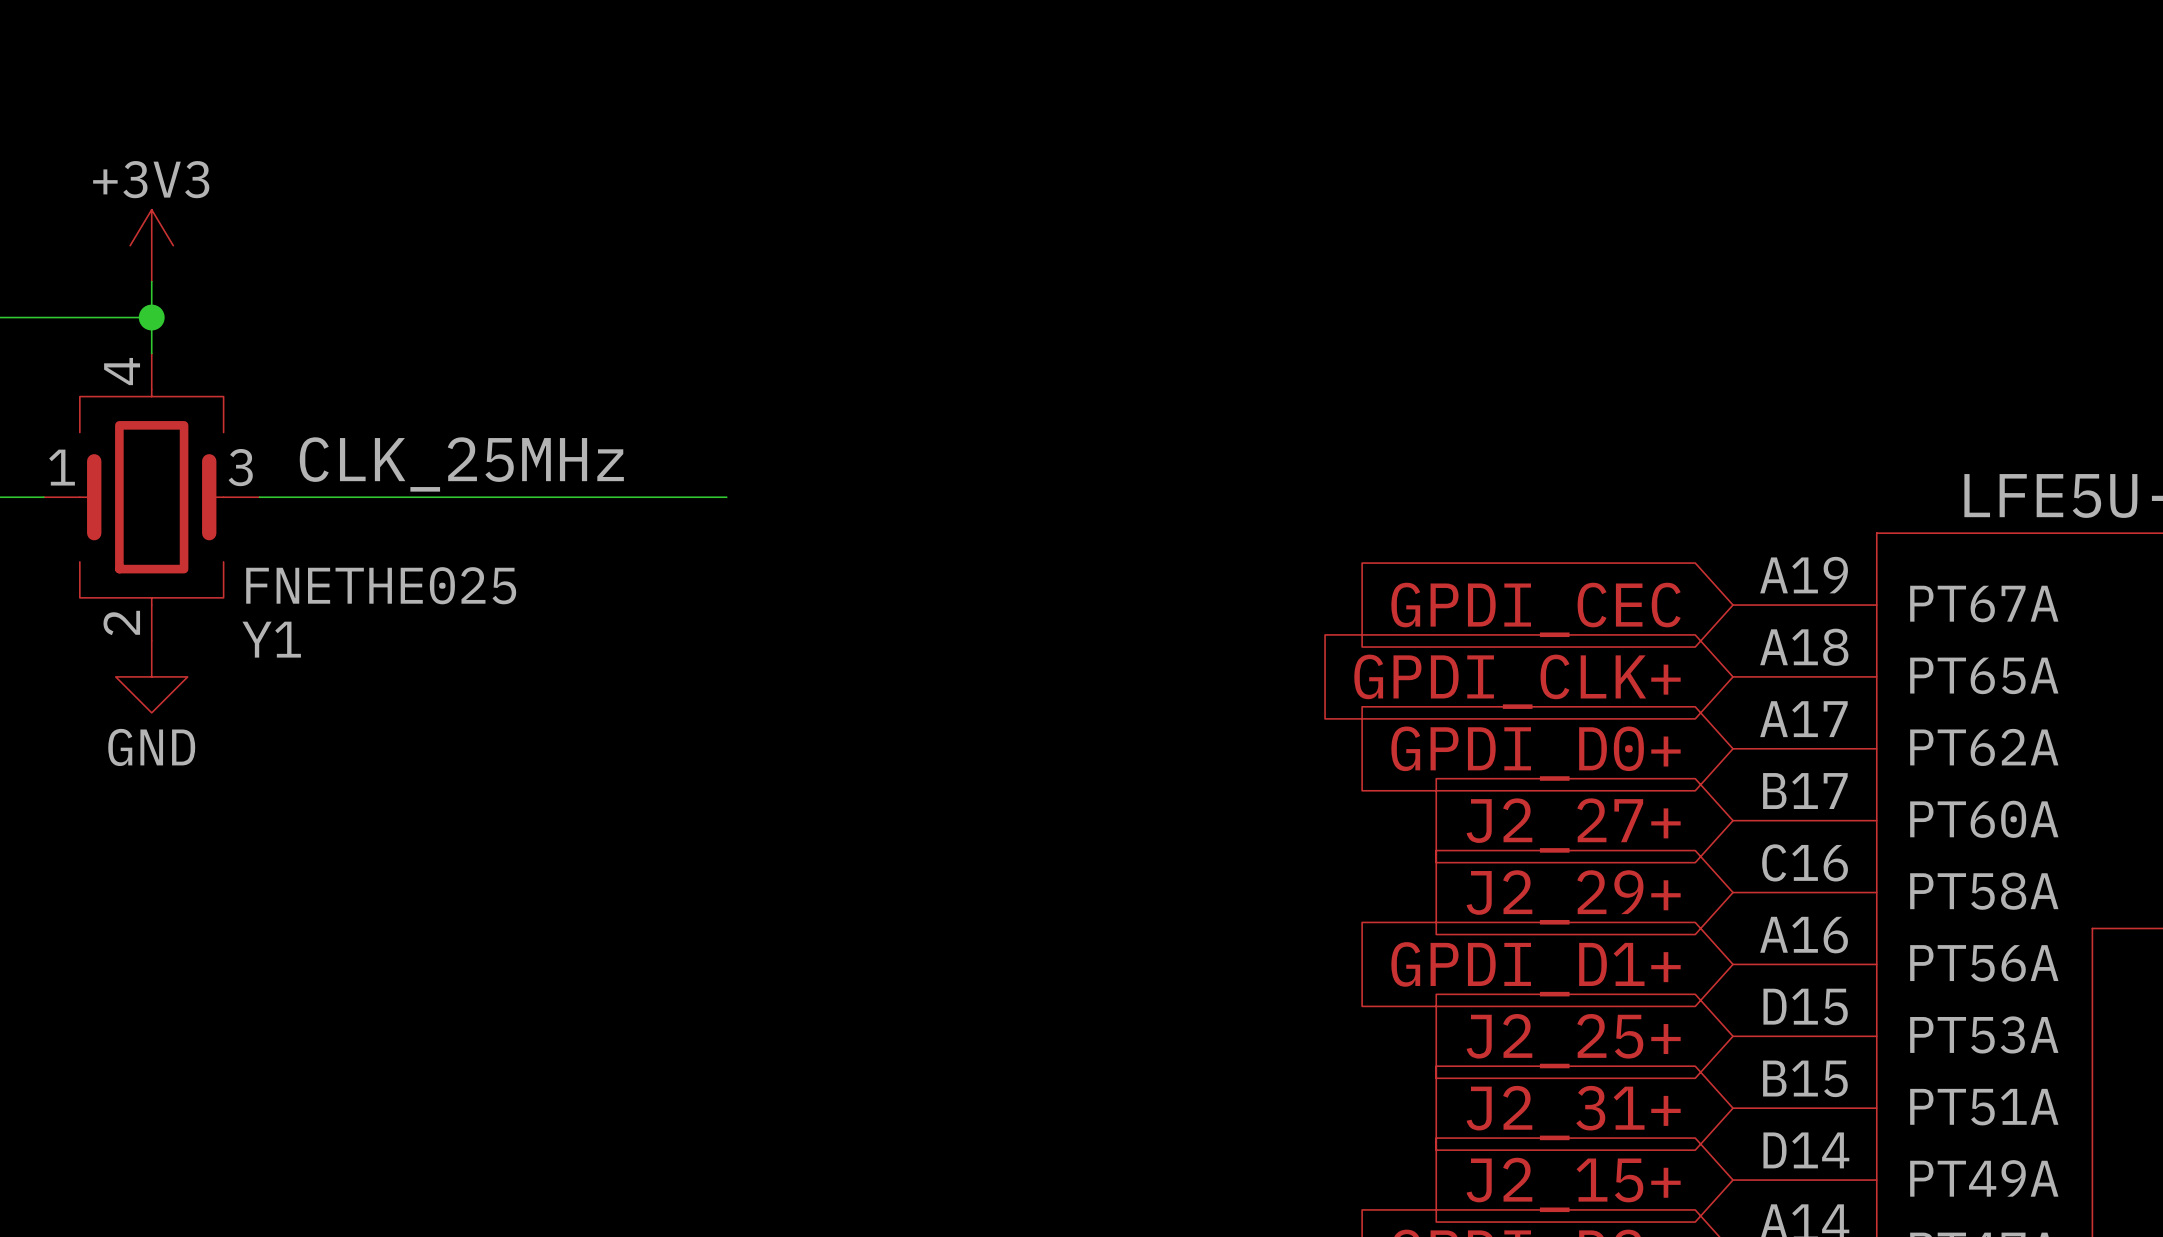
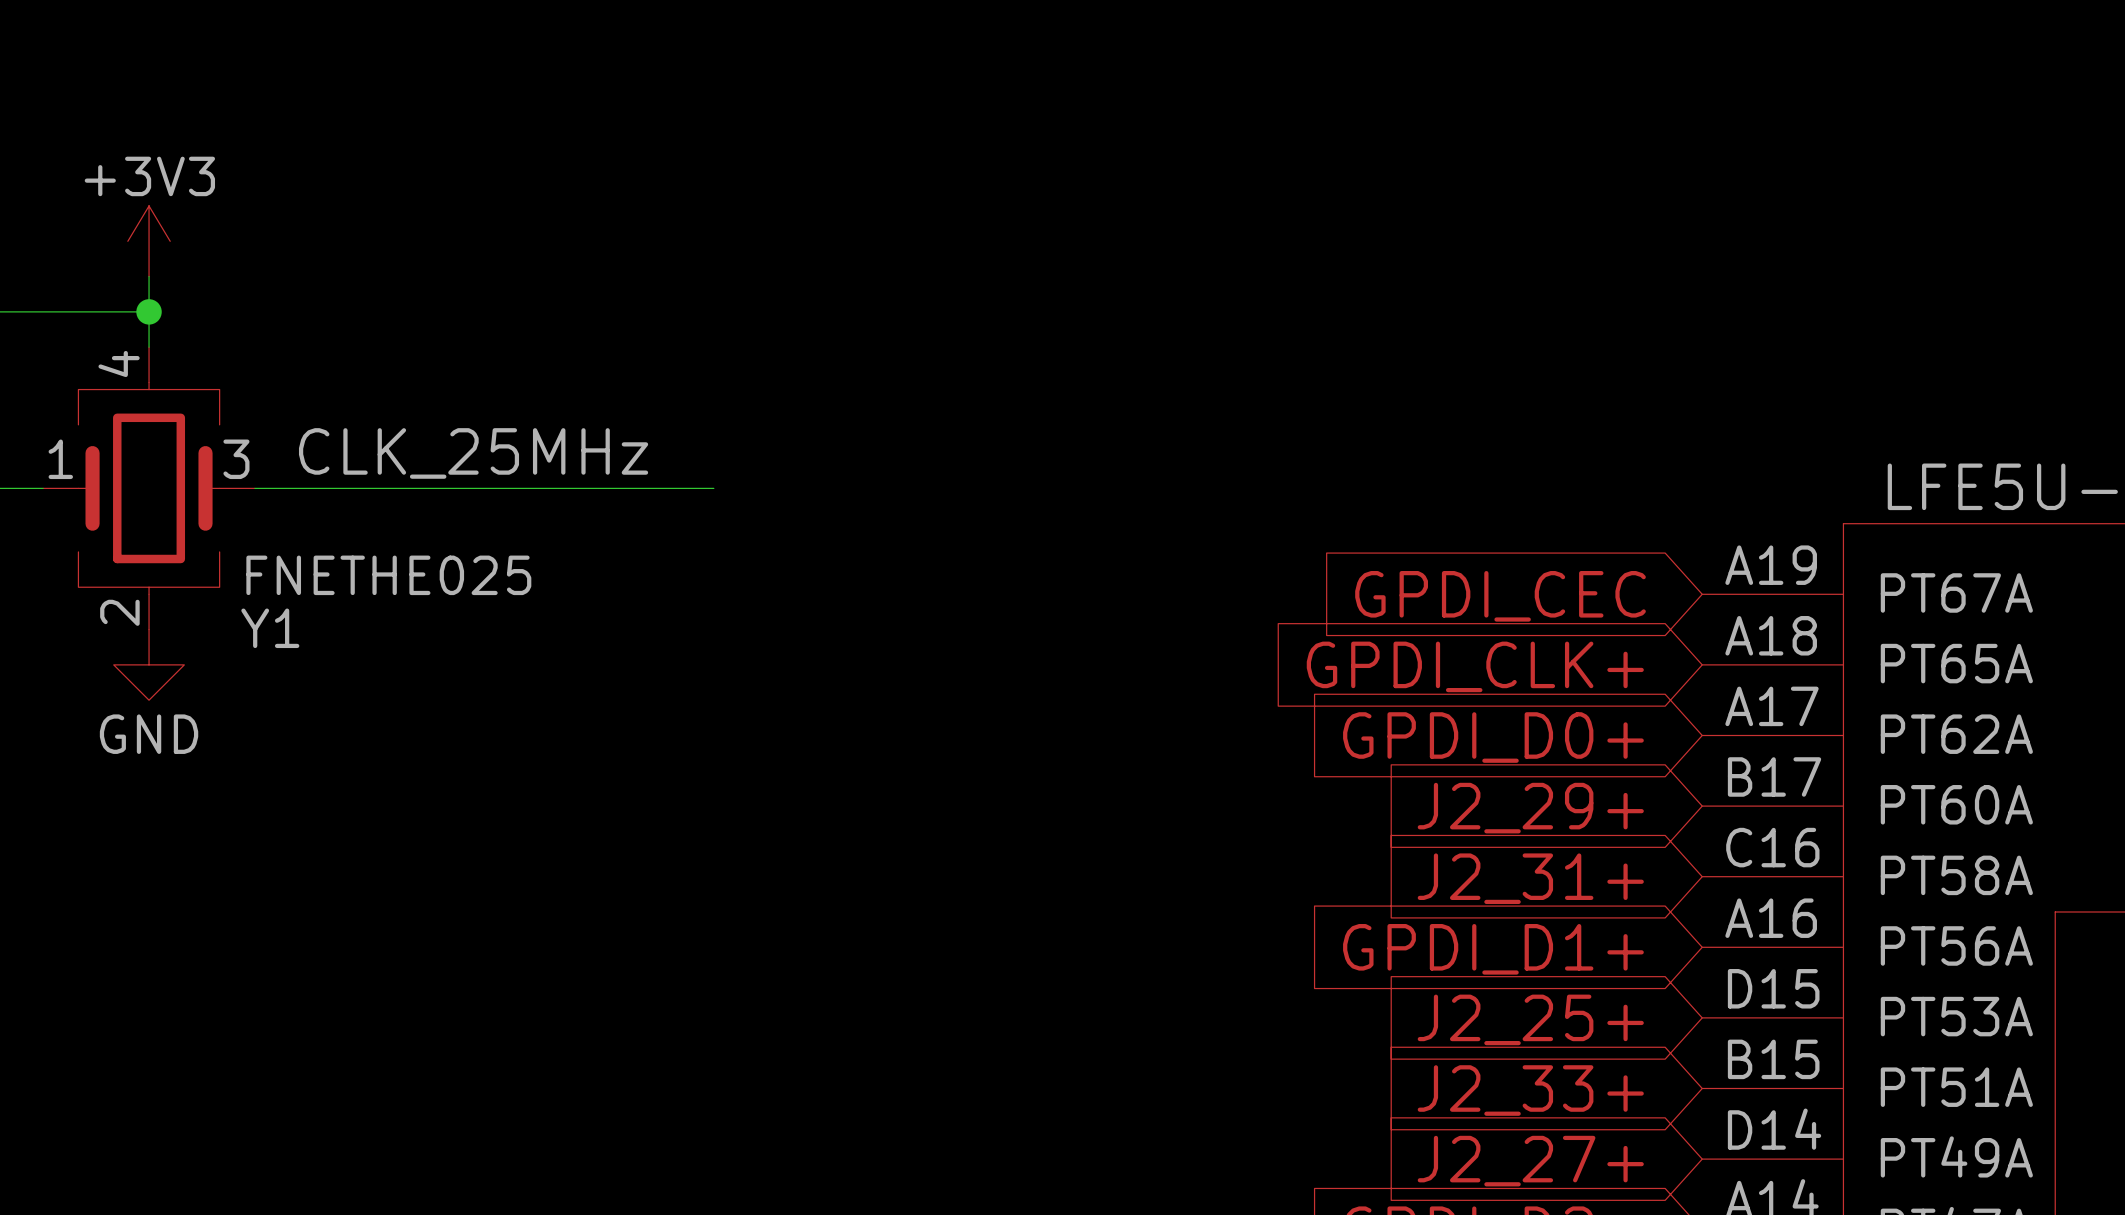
global label: J2_27+ (1573, 825) -> J2_29+ (1530, 808)
global label: J2_29+ (1573, 897) -> J2_31+ (1530, 878)
global label: J2_31+ (1573, 1113) -> J2_33+ (1530, 1090)
global label: J2_15+ (1573, 1184) -> J2_27+ (1530, 1161)

